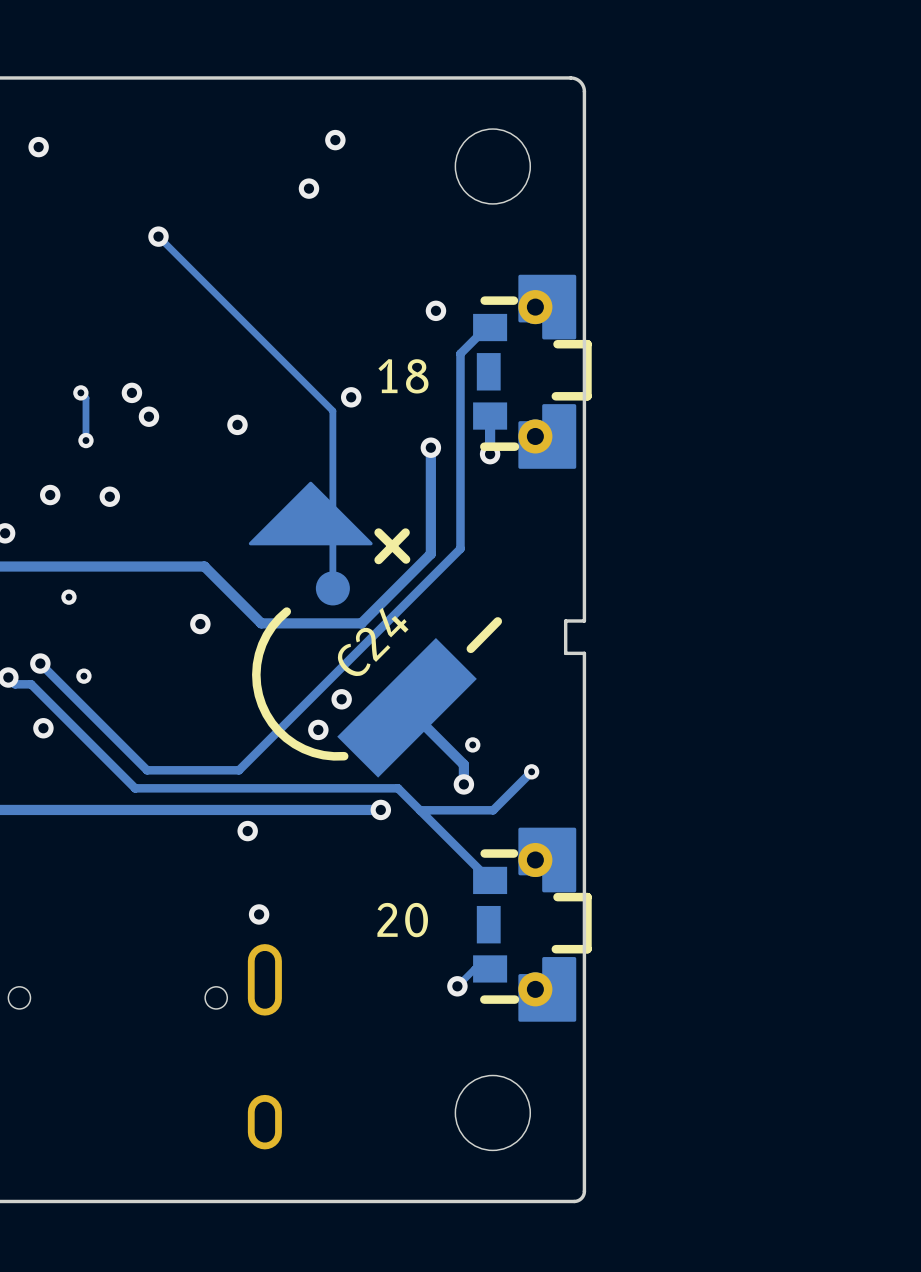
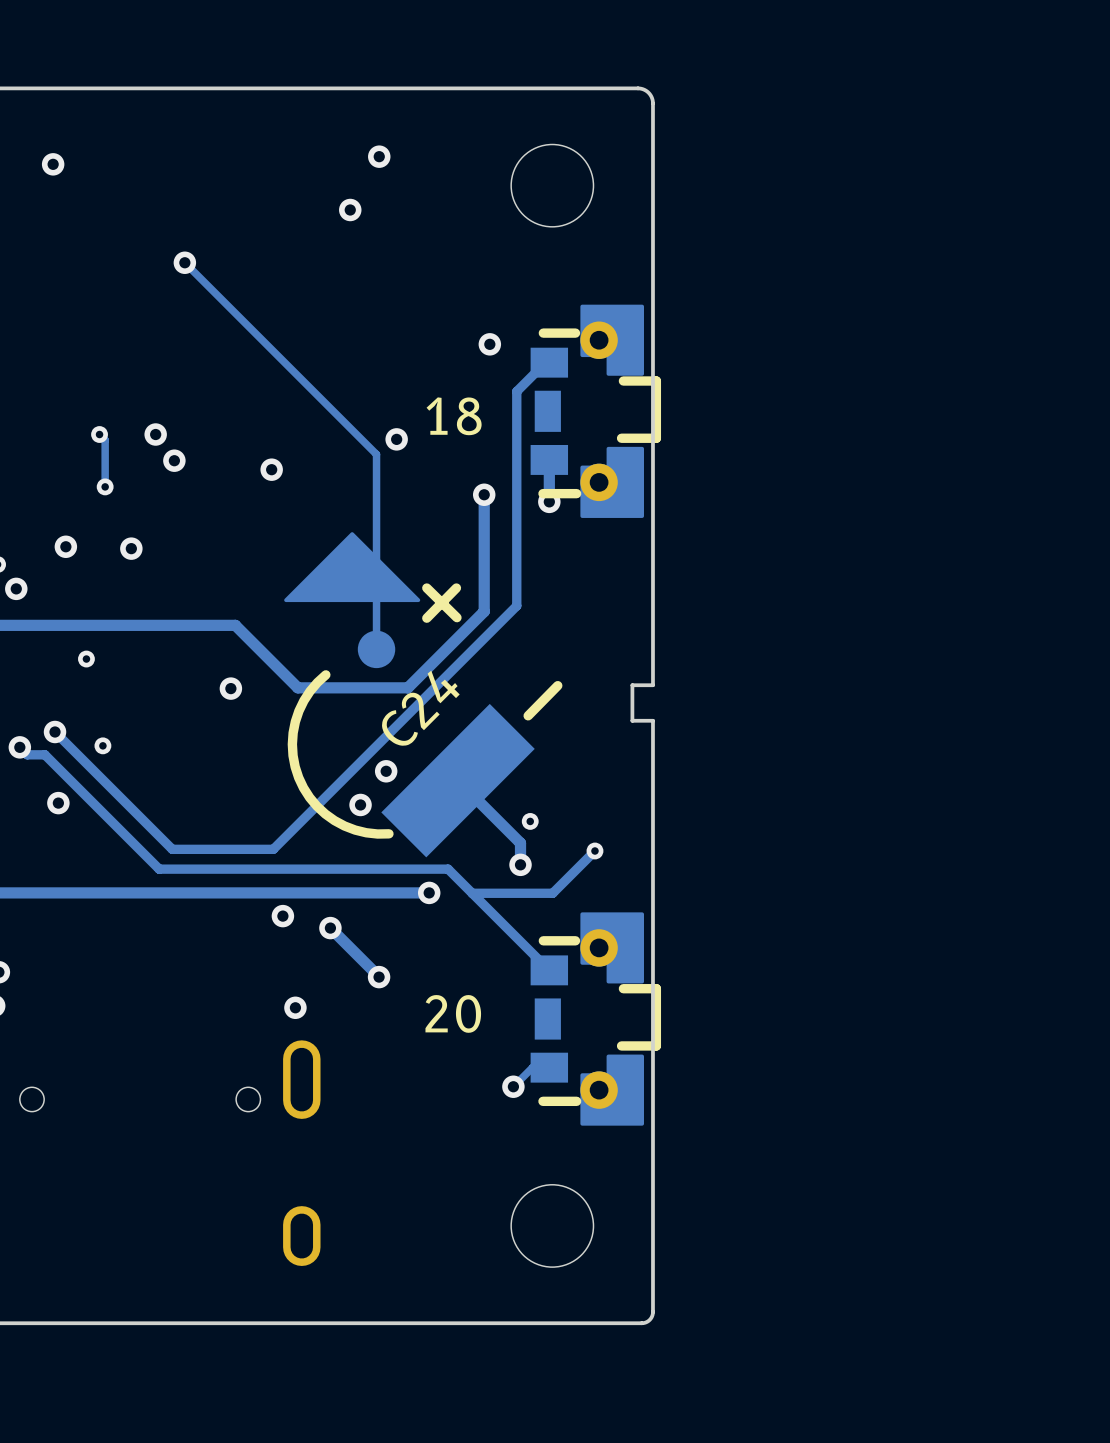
track: none -> (330, 928) (379, 976)
via: none -> (330, 928)
via: none -> (379, 977)

